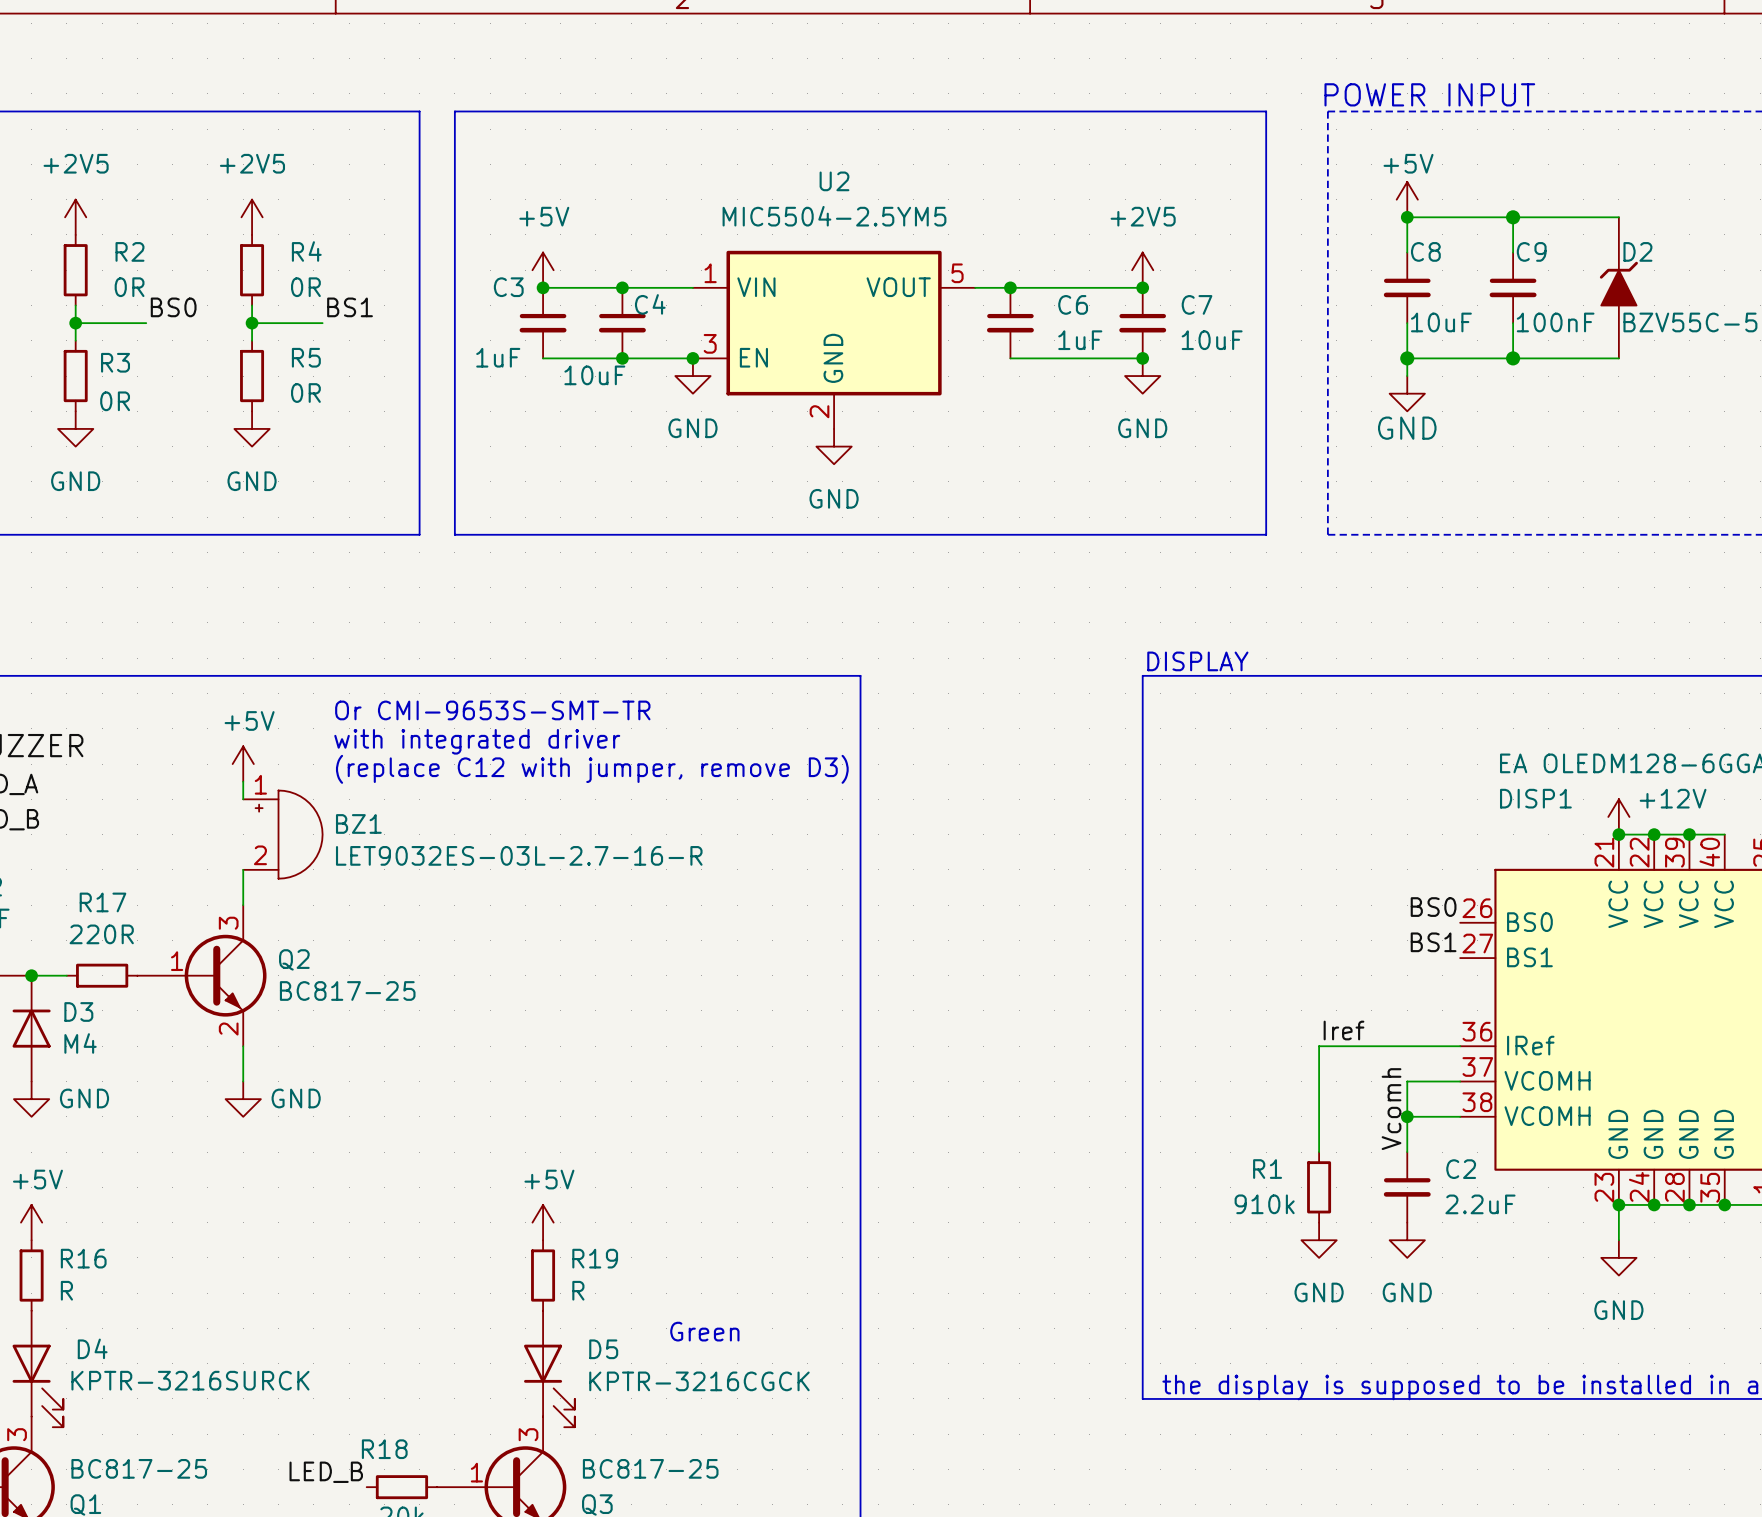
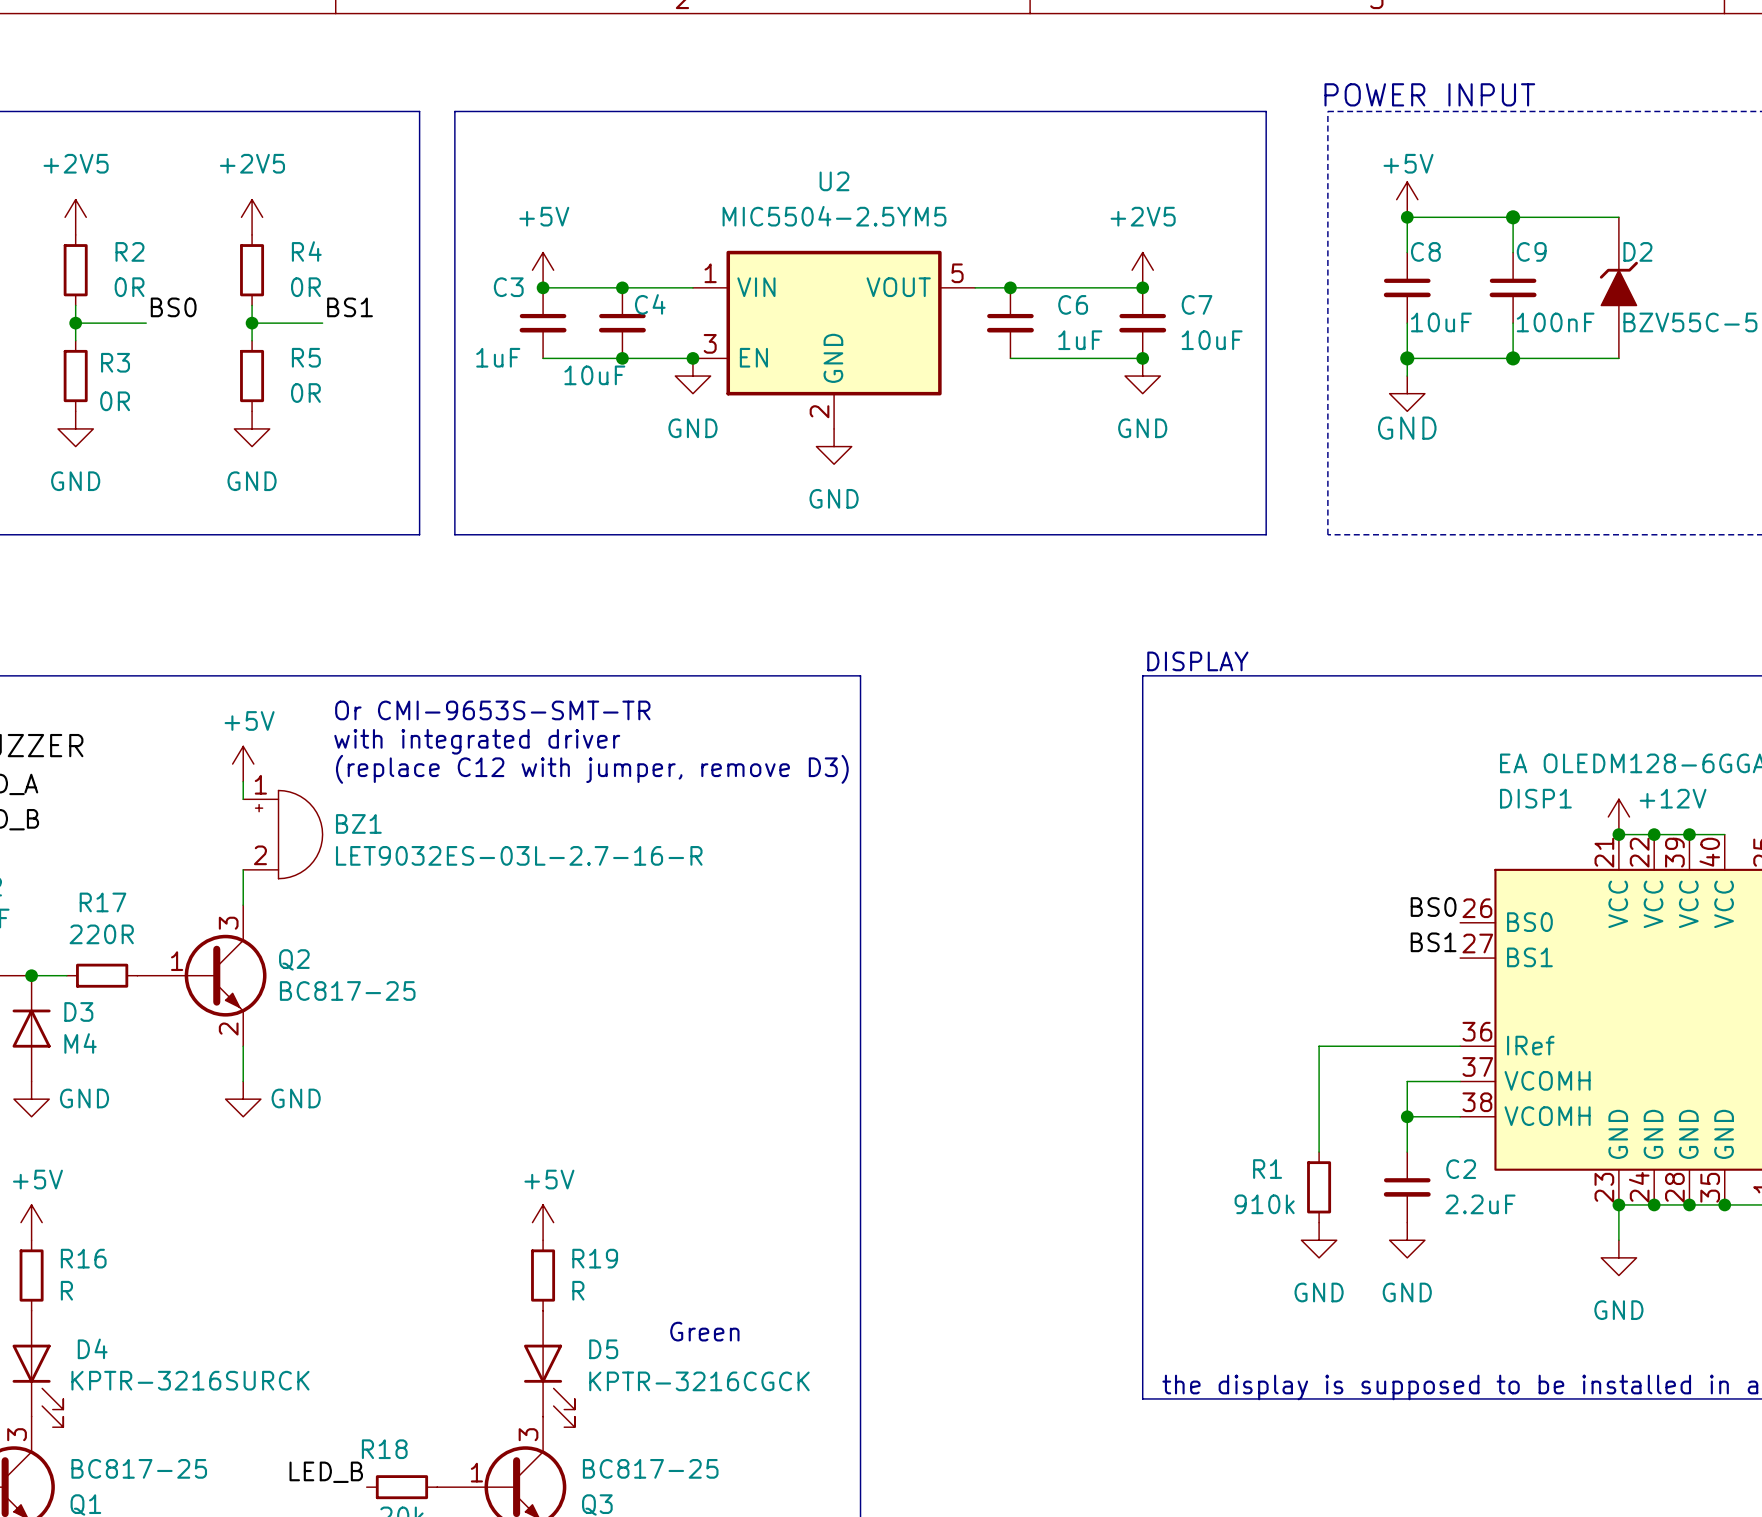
label: Iref (1343, 1030) -> none
label: Vcomh (1391, 1109) -> none

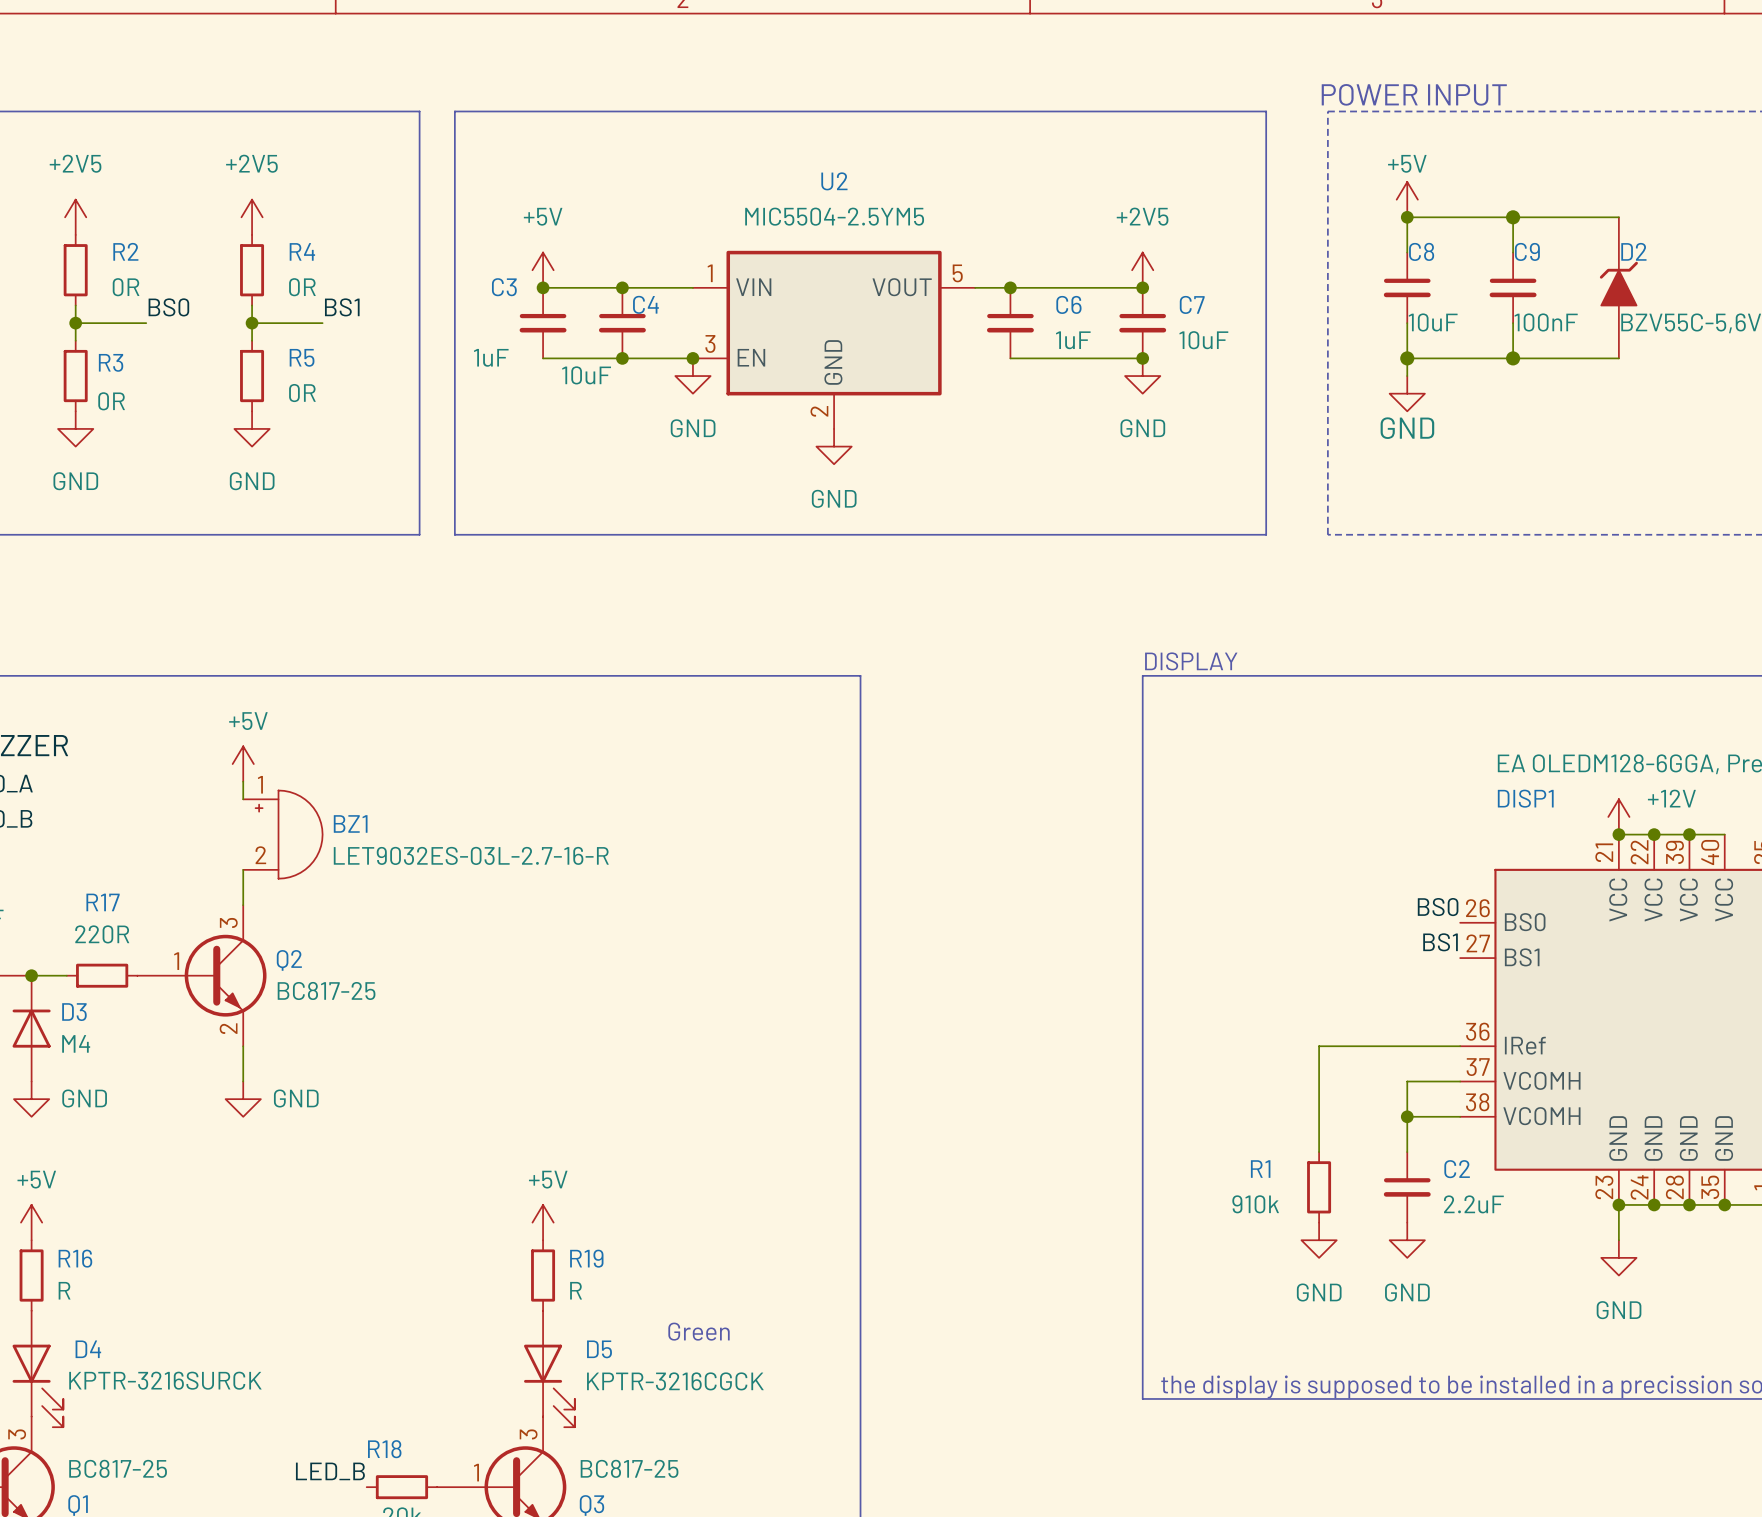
text: Or CMI-9653S-SMT-TR (492, 710) -> none
text: with integrated driver (477, 741) -> none
text: (replace C12 with jumper, remove D3) (592, 769) -> none

